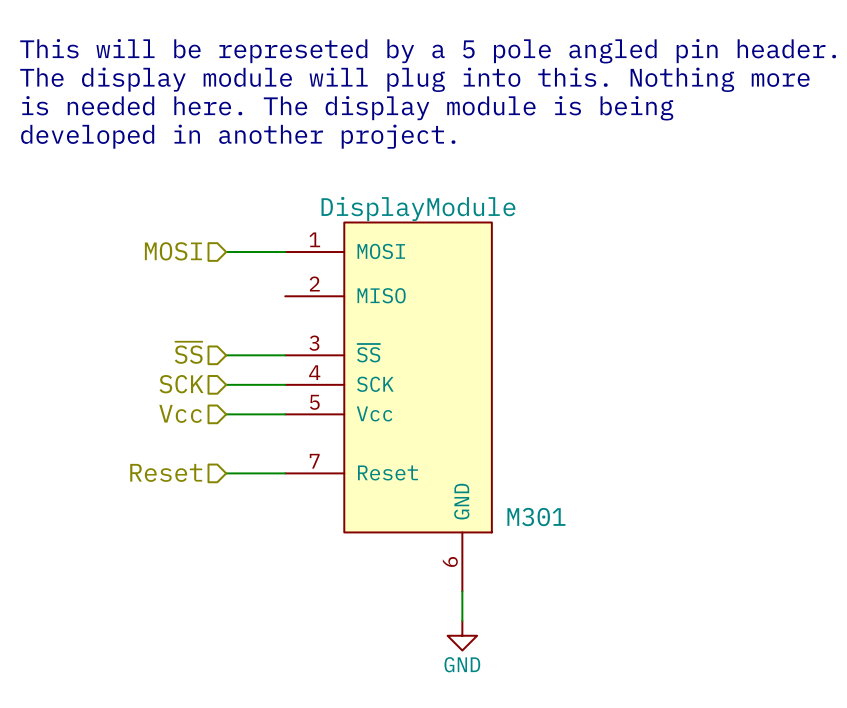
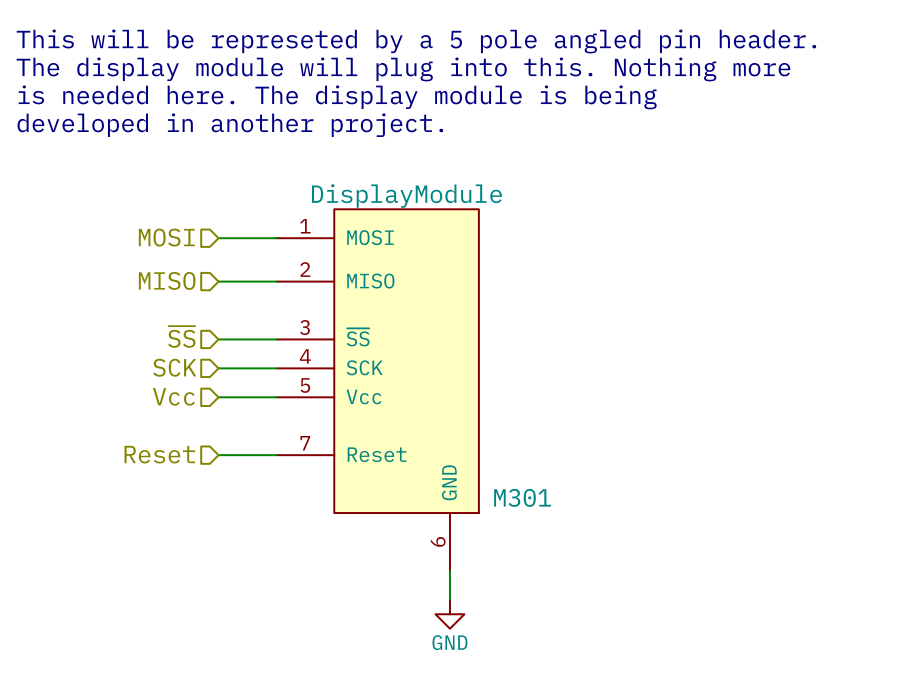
hierarchical label: none -> MISO (167, 280)
wire: none -> (218, 281) (276, 281)

